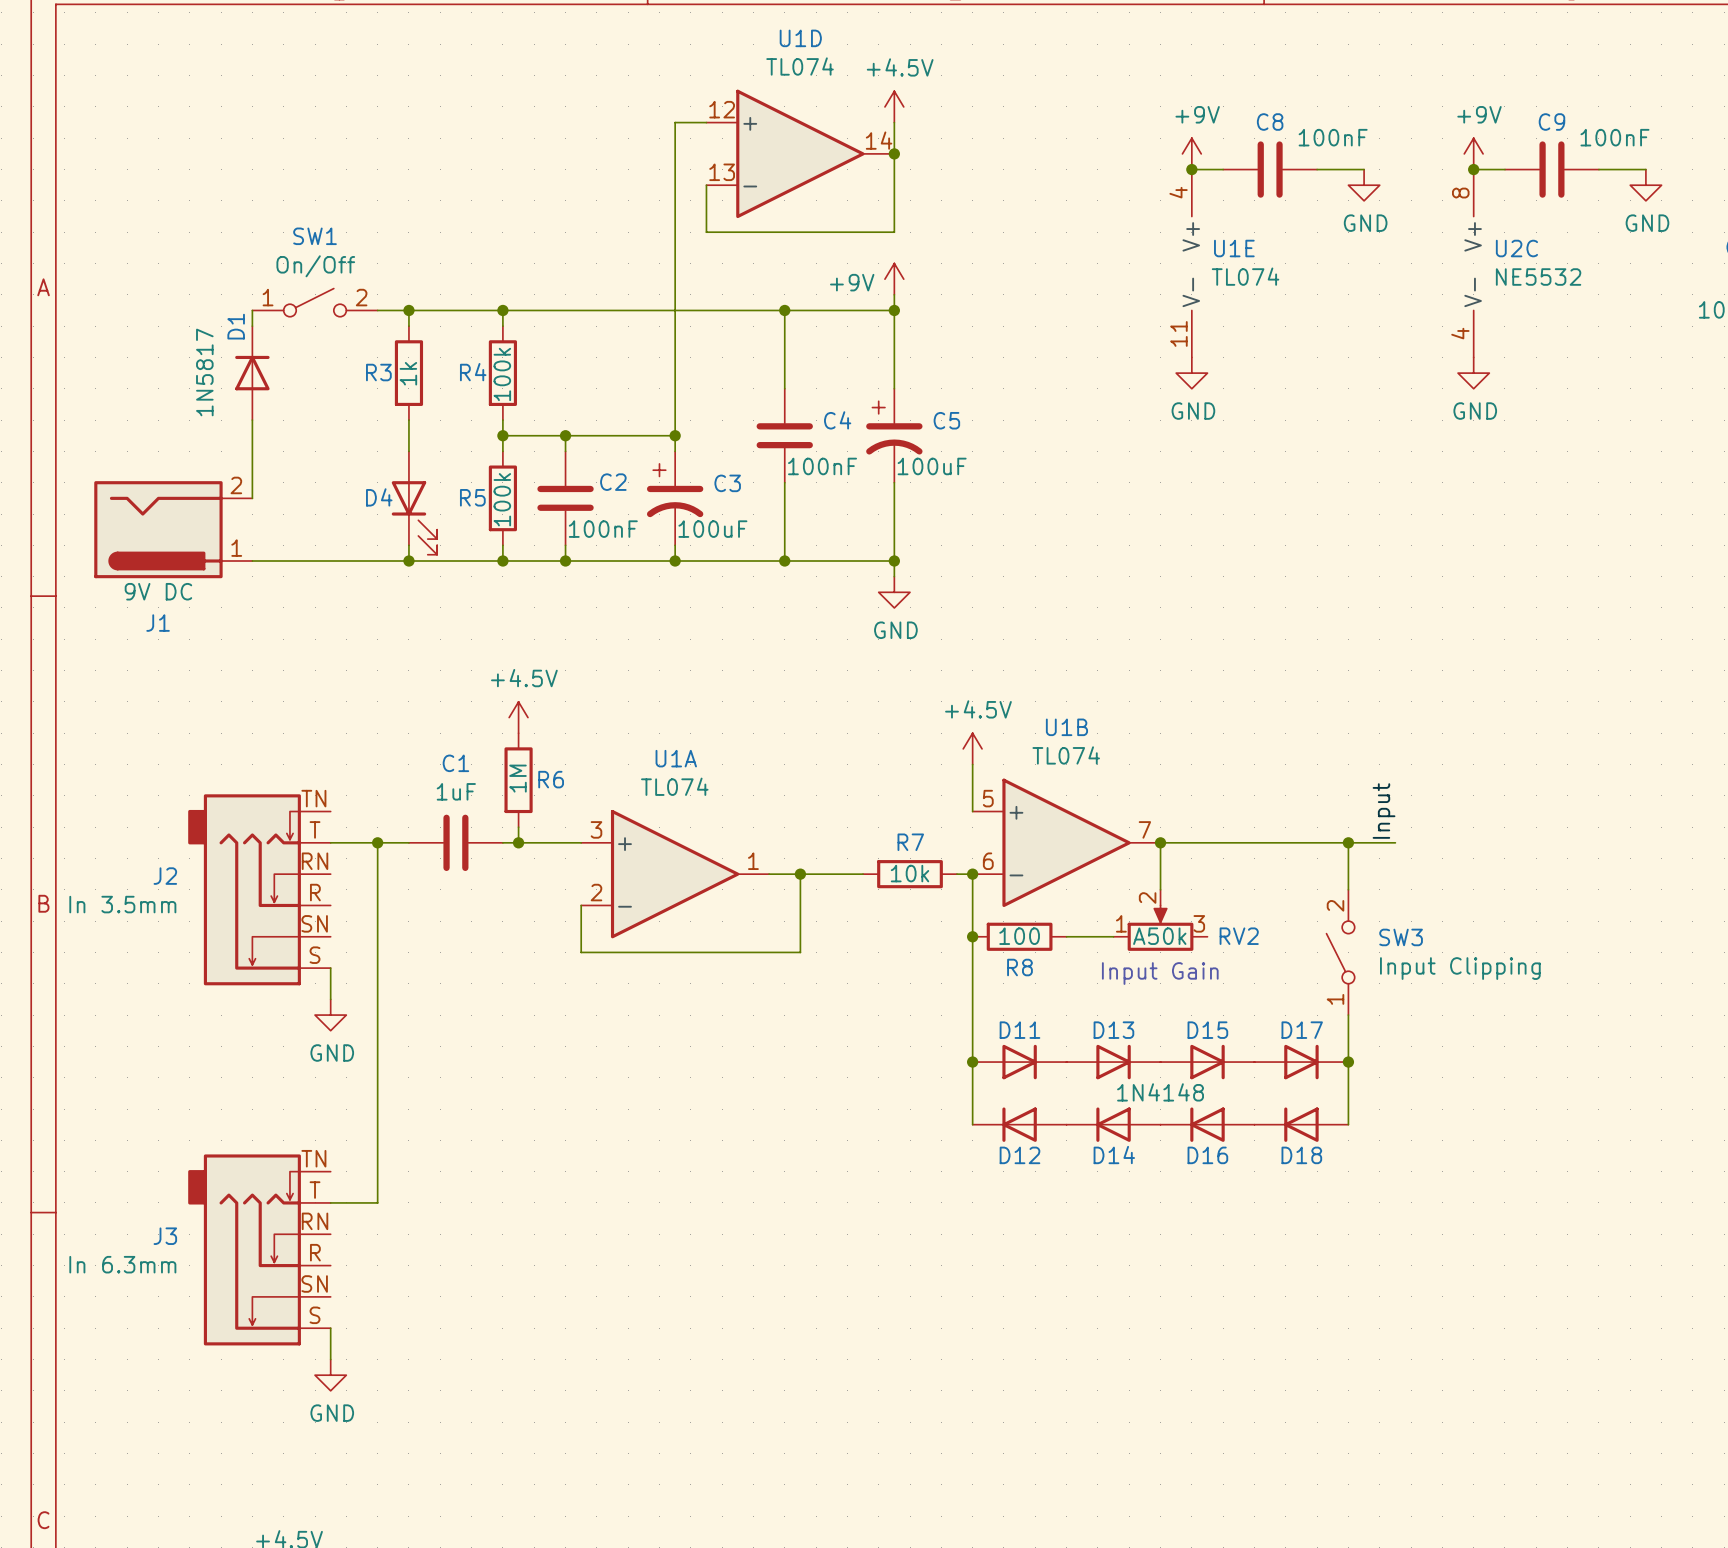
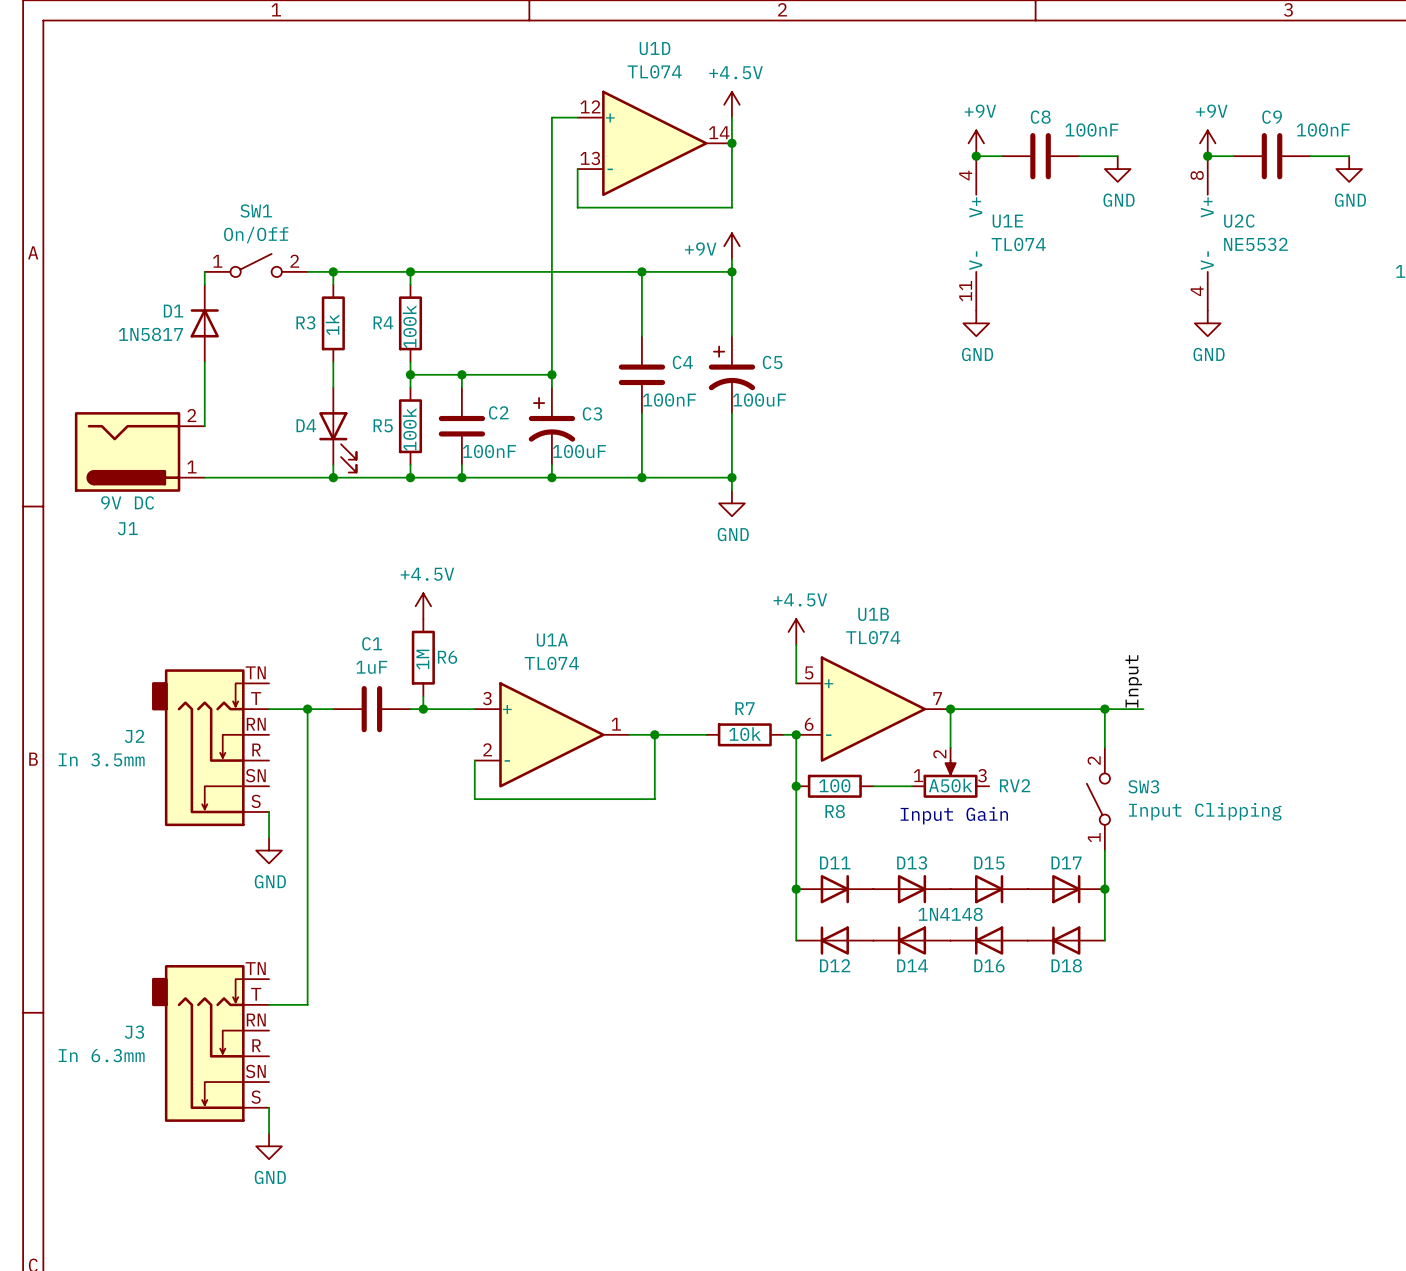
D1 name rotation: 0° (236, 326) -> 90° clockwise (173, 311)
D1 name position: D1 (236, 326) -> D1 (173, 311)
D1 value rotation: 0° (204, 372) -> 90° clockwise (150, 334)

